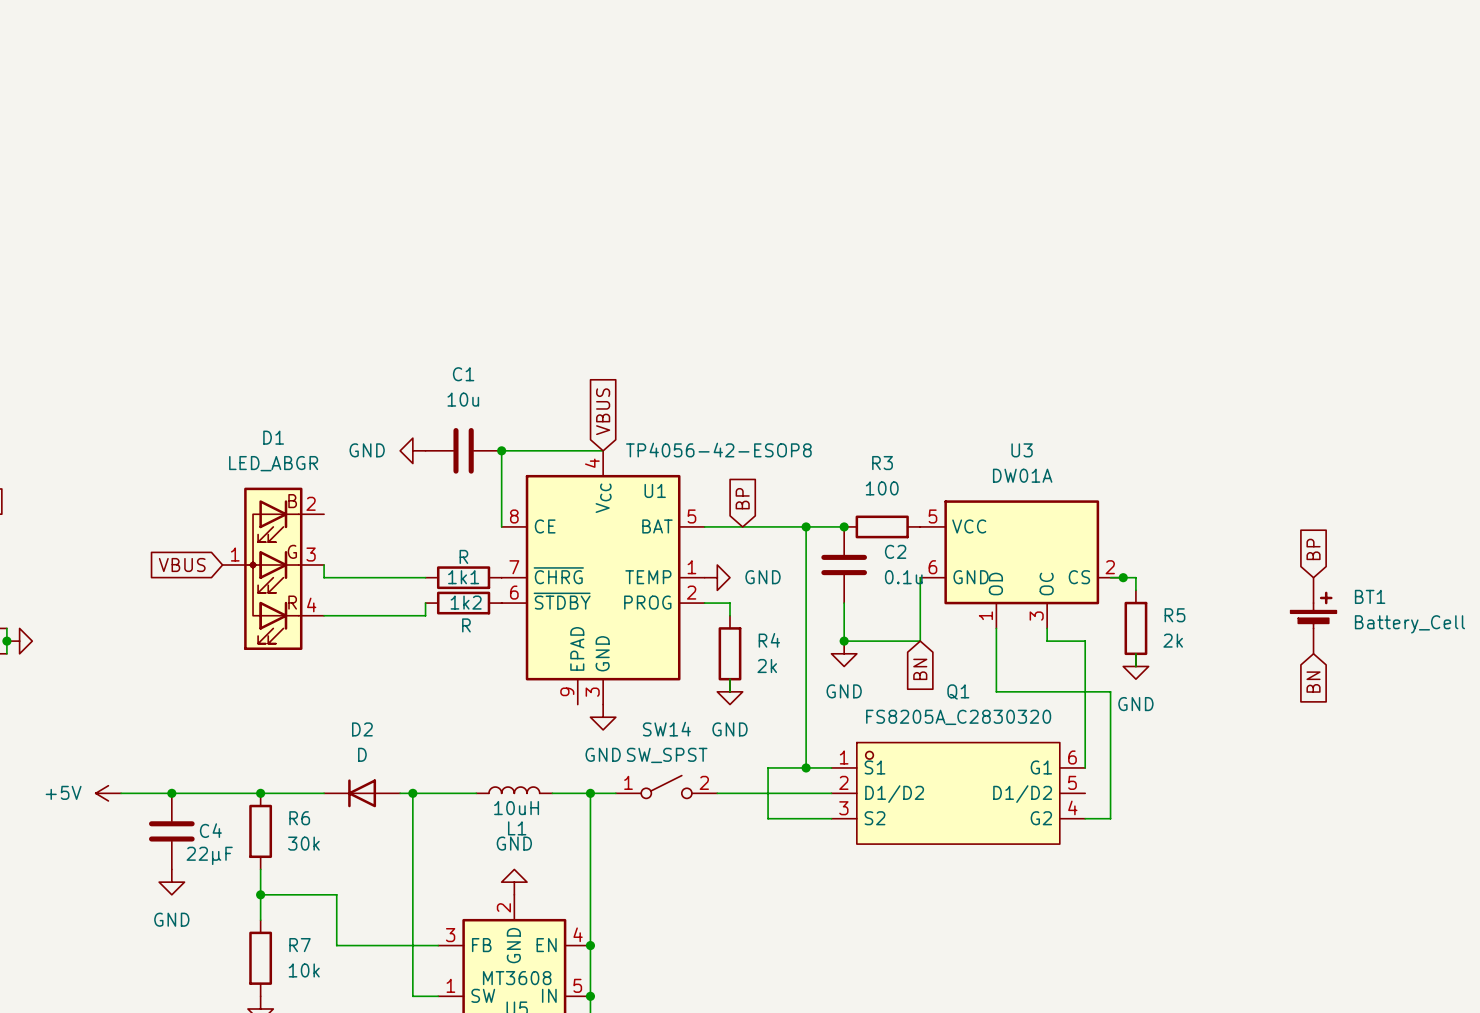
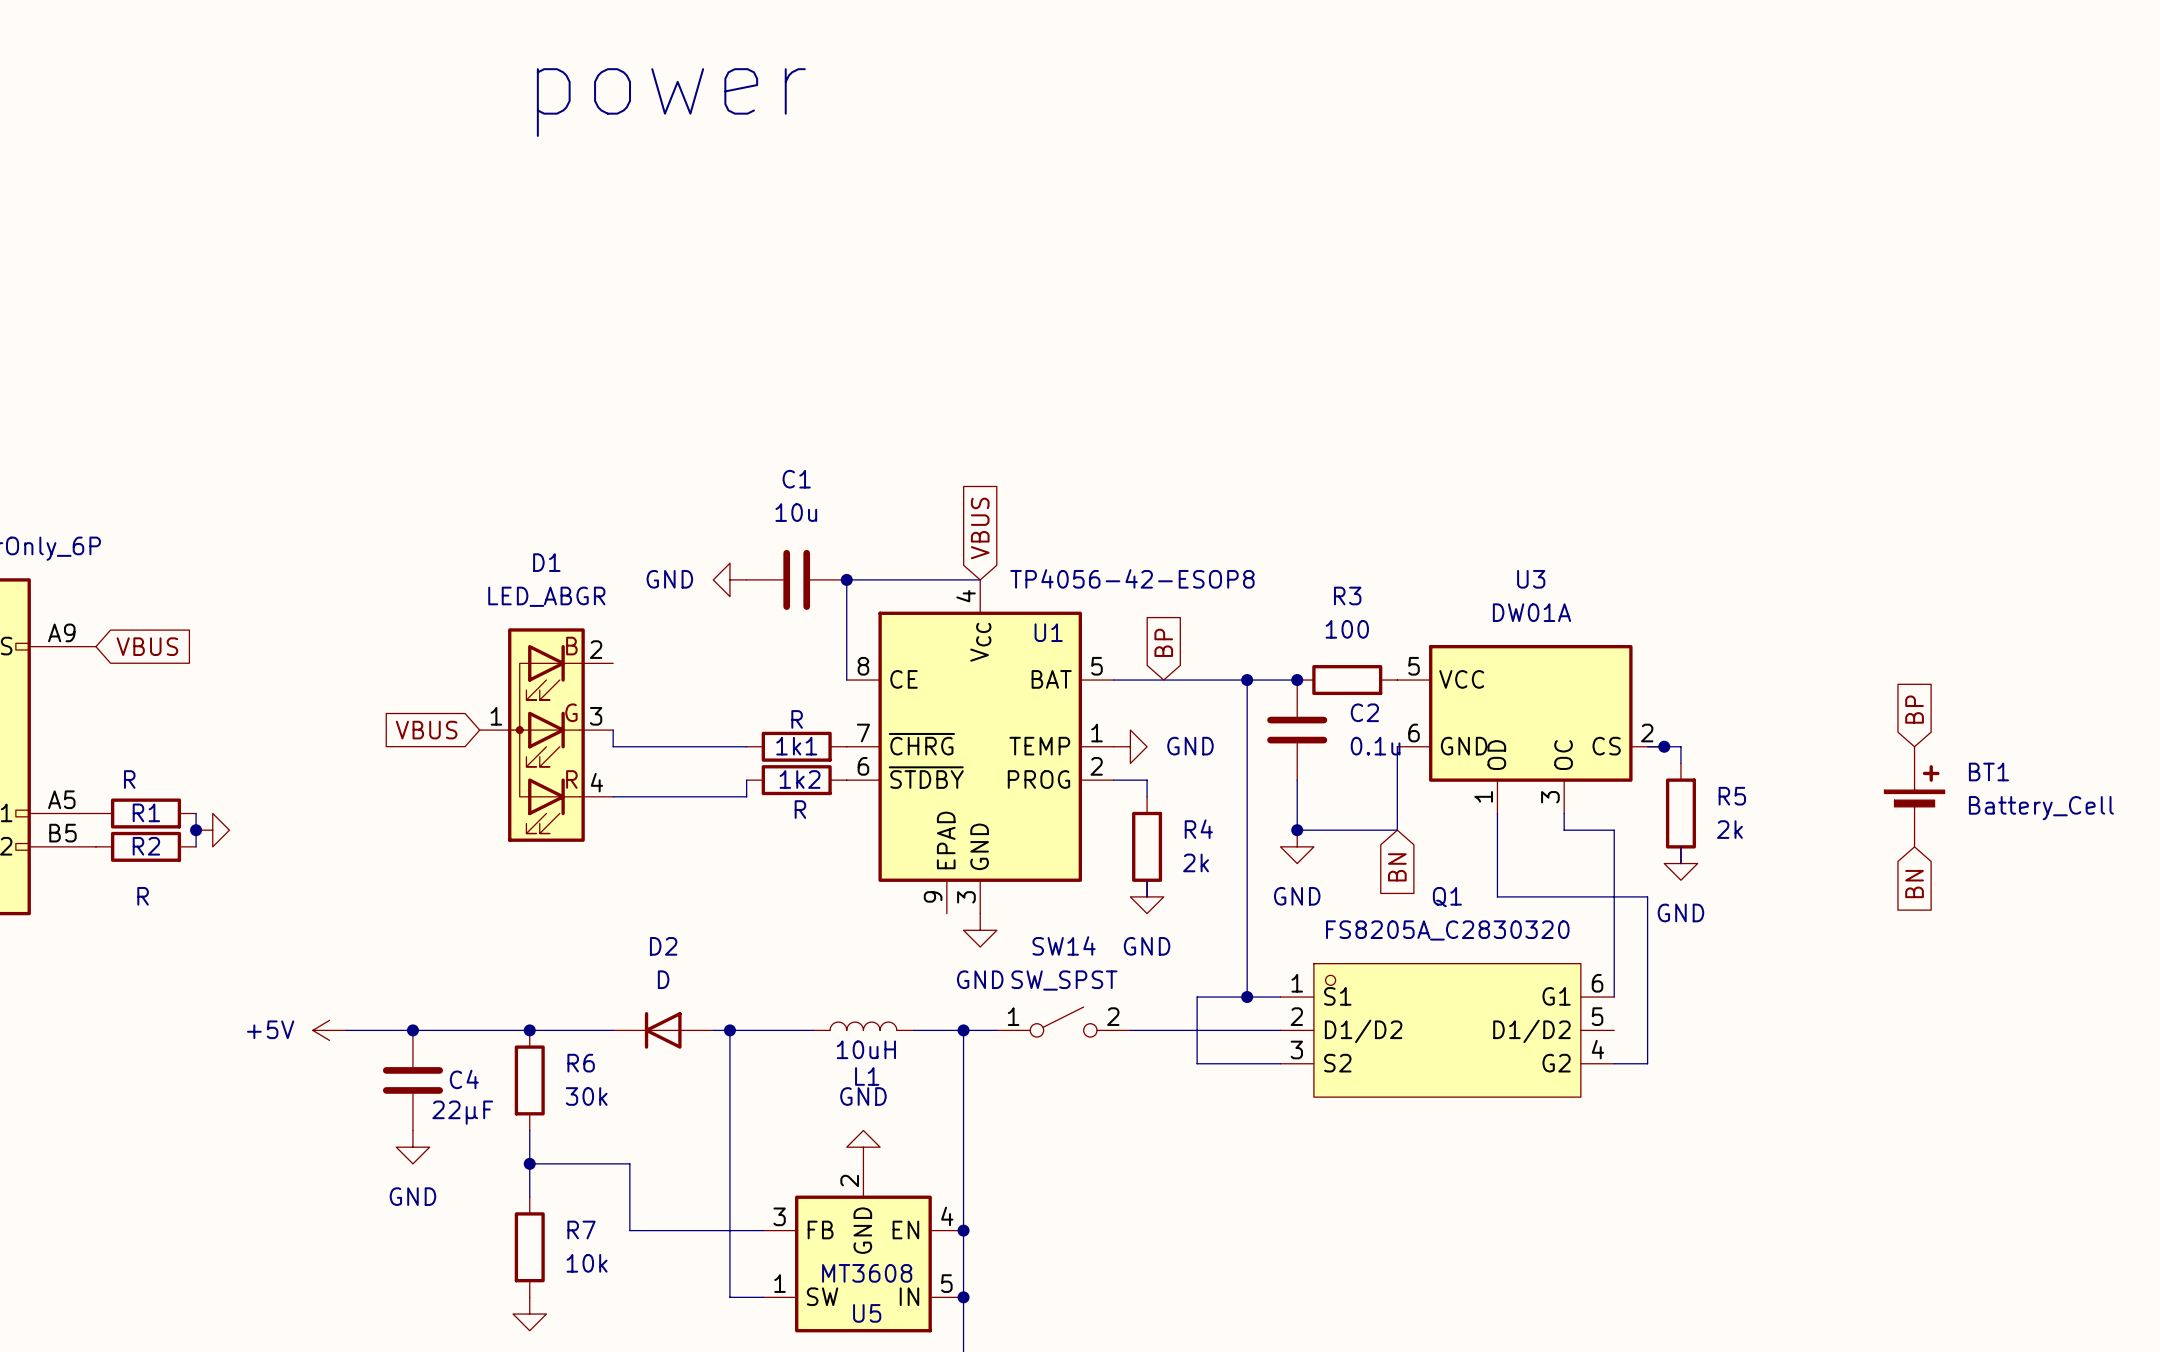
text: none -> power (671, 102)

